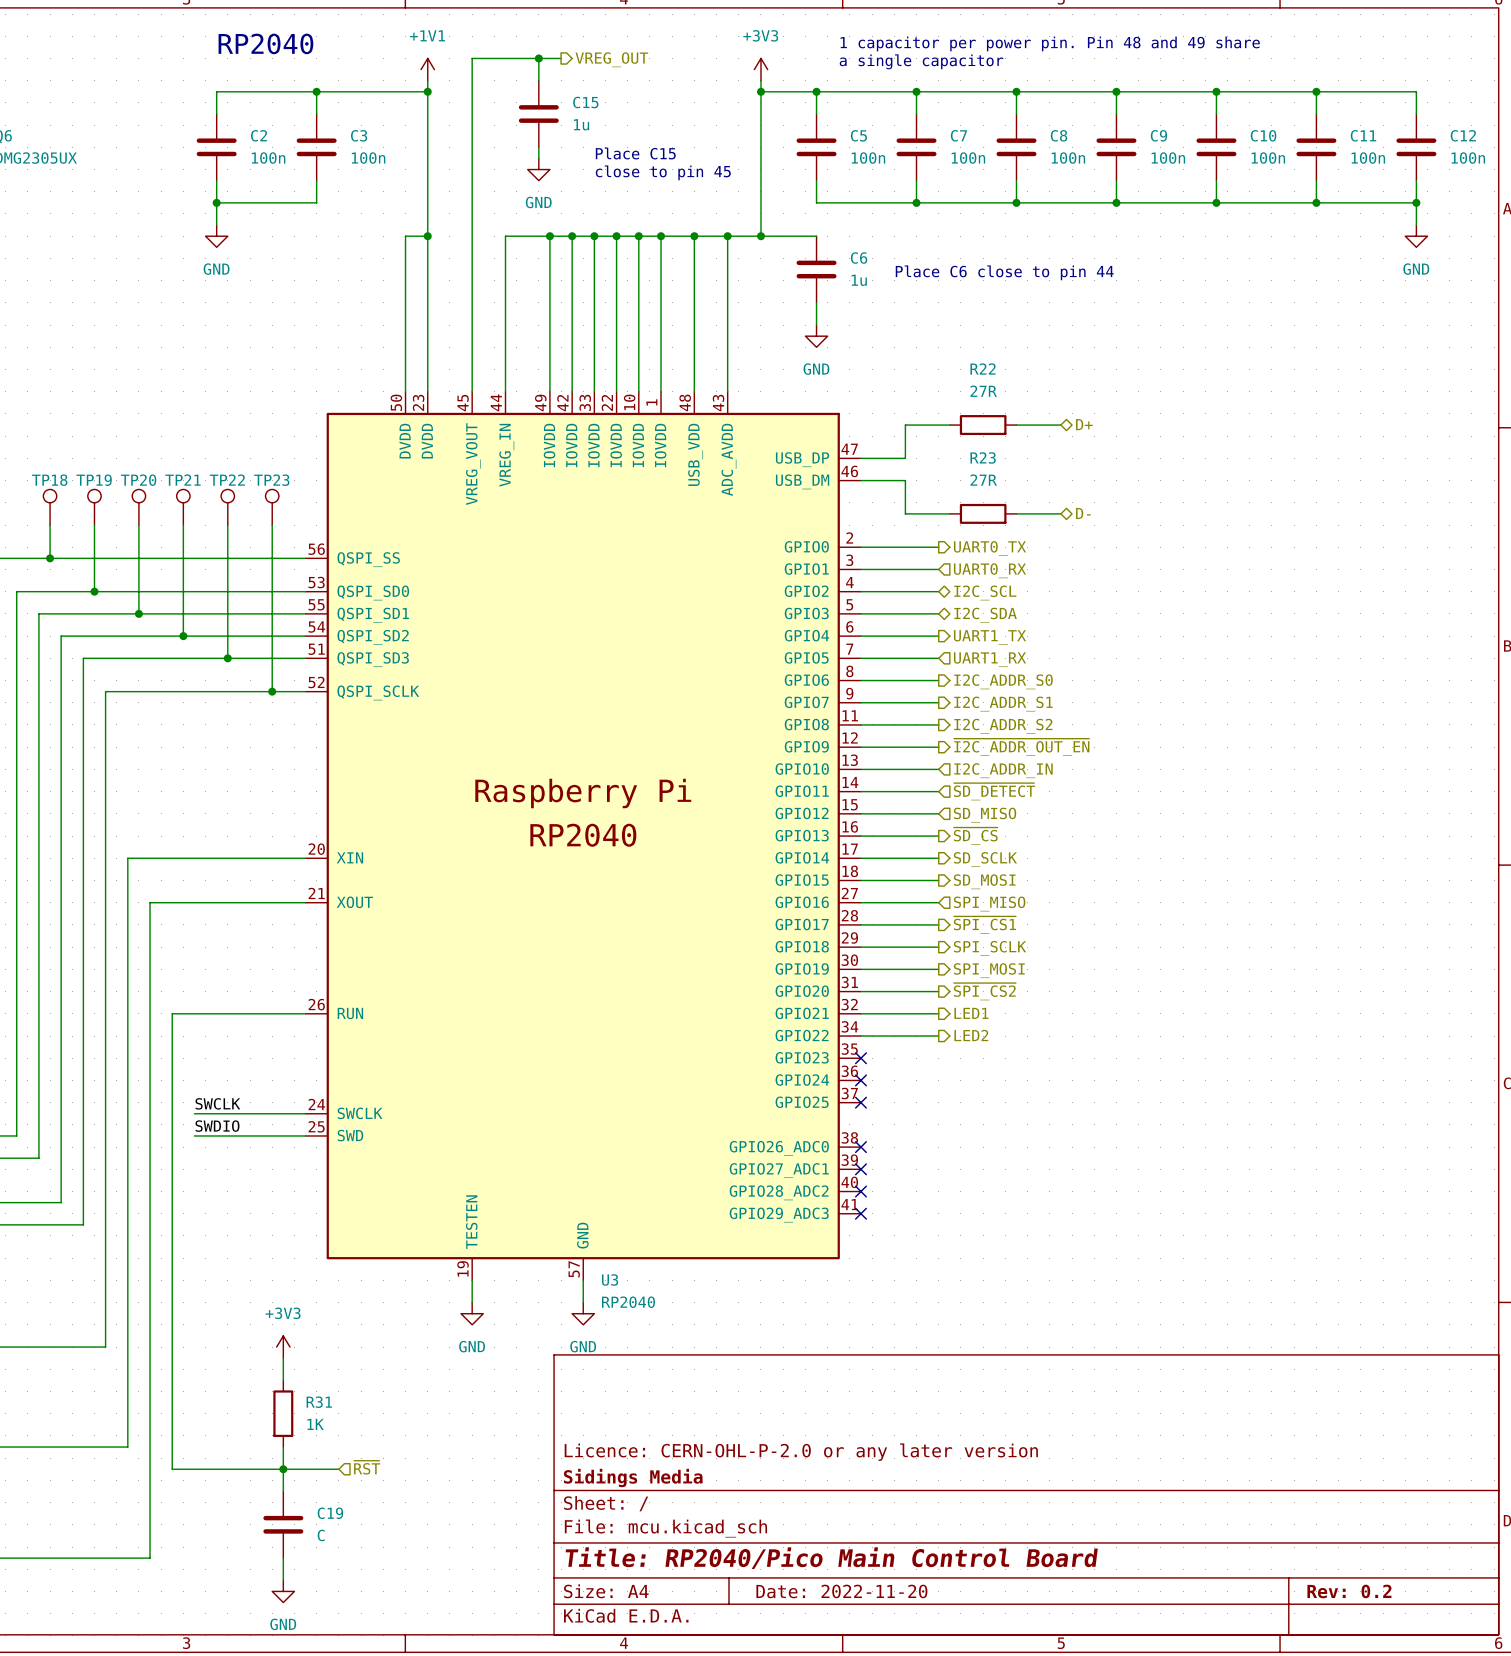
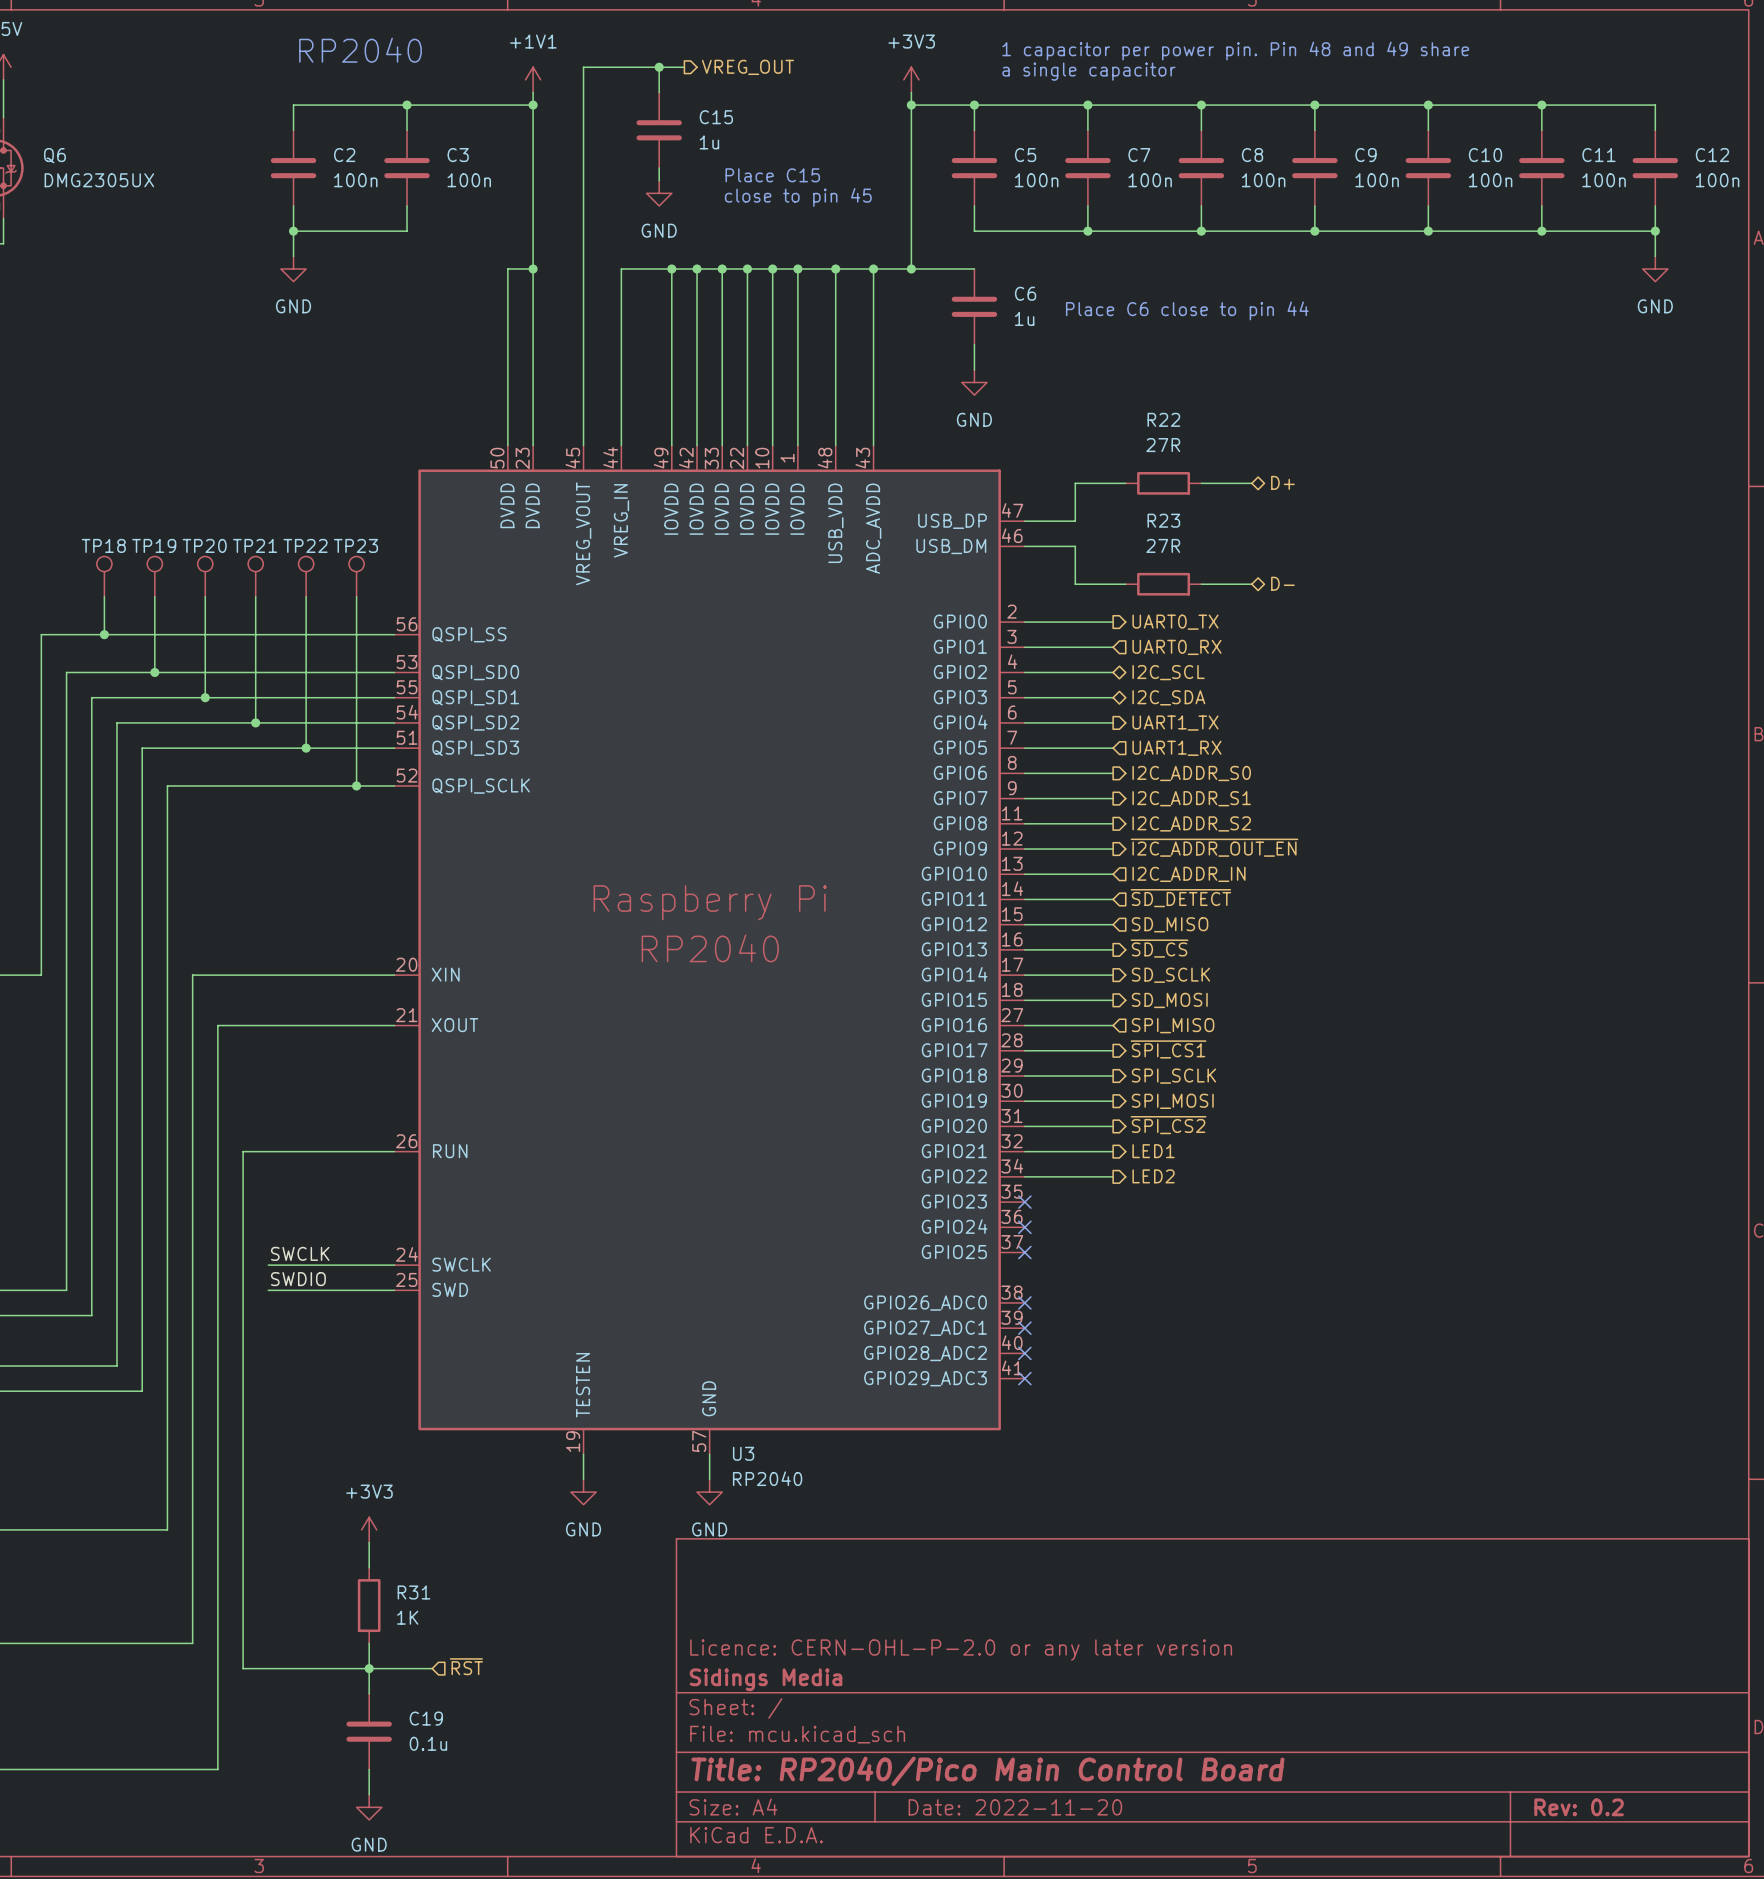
C19 value: C (321, 1535) -> 0.1u (428, 1743)

